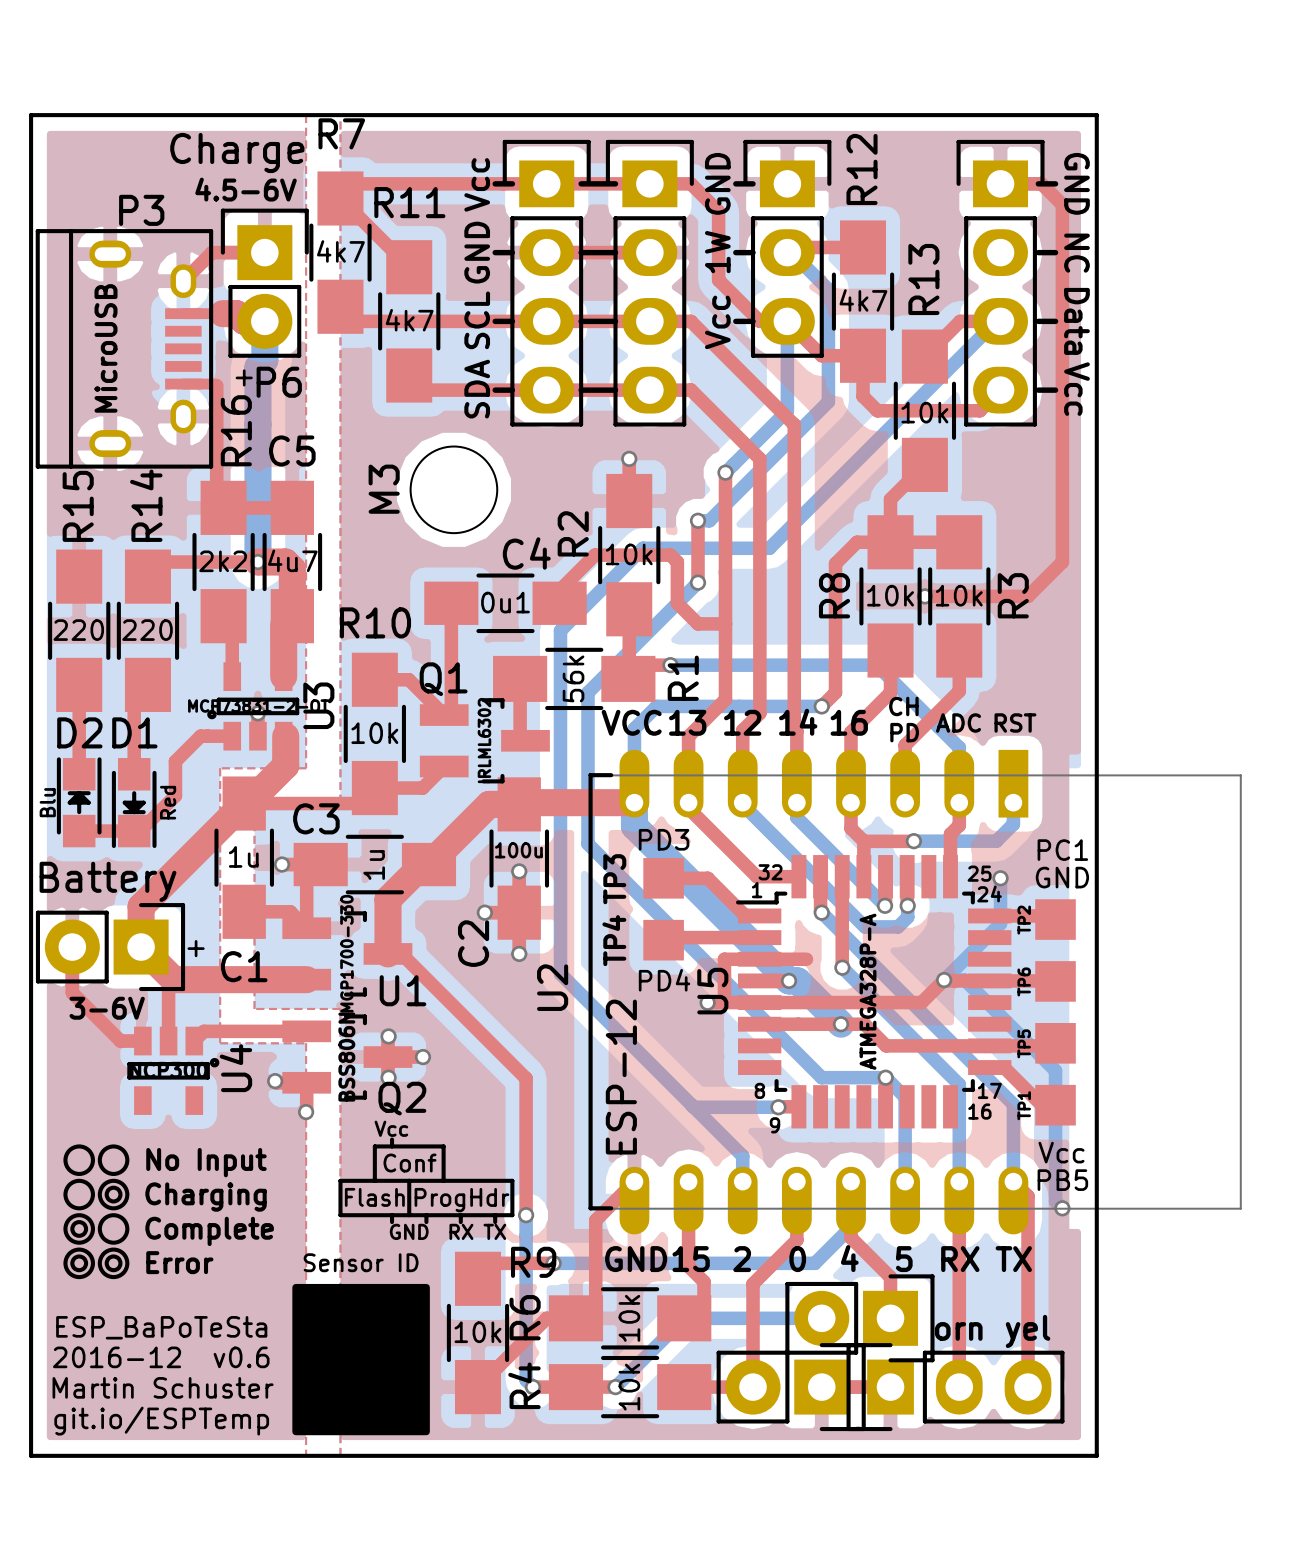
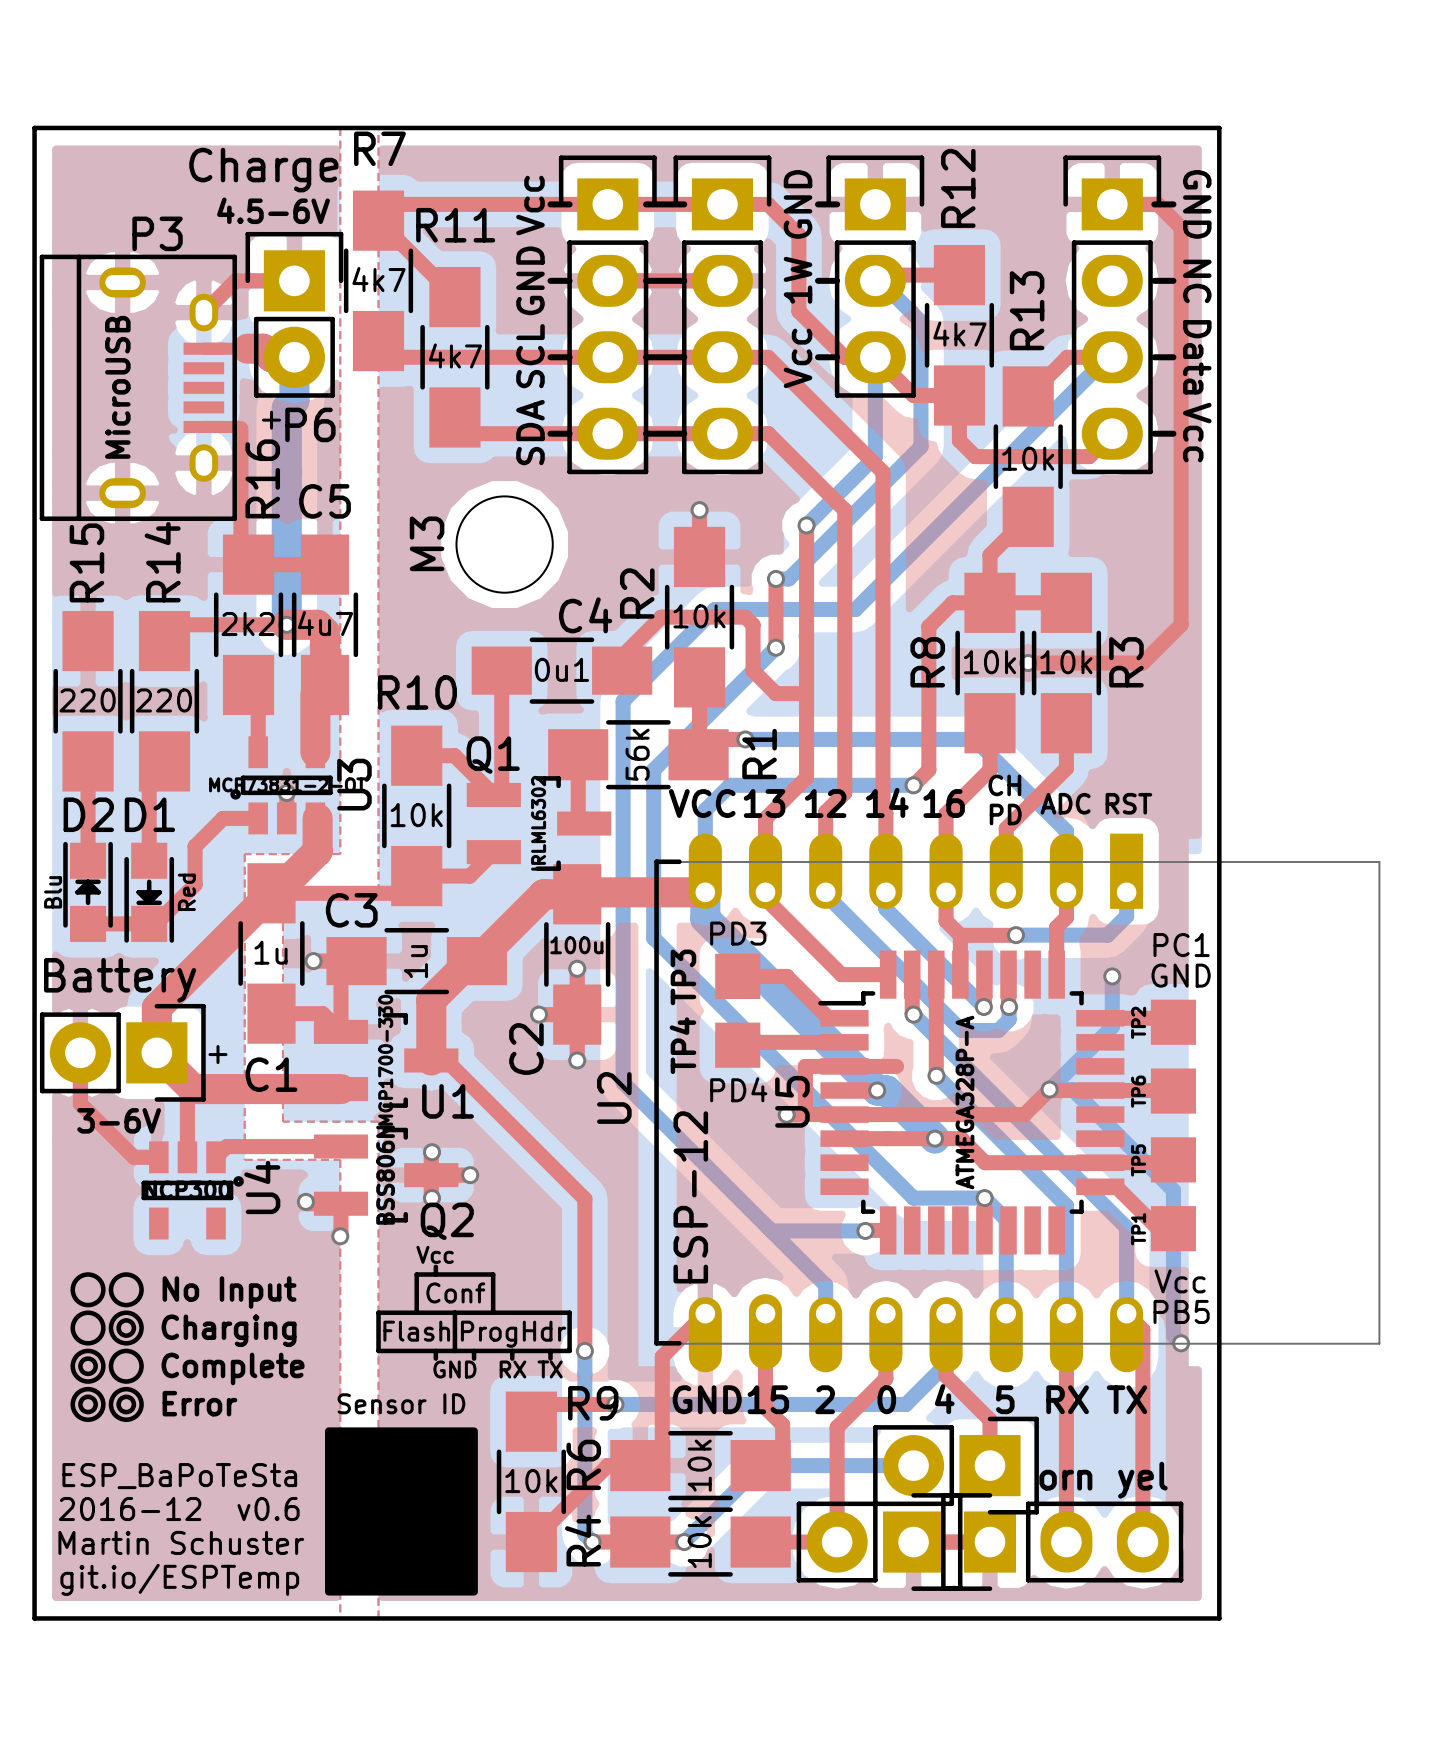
text: 32 (770, 872) -> none
text: 25 (979, 873) -> none
text: 1 (757, 890) -> none
text: 24 (989, 893) -> none
text: 8 (759, 1090) -> none
text: 17 (989, 1090) -> none
text: 16 (979, 1111) -> none
text: 9 (775, 1125) -> none

